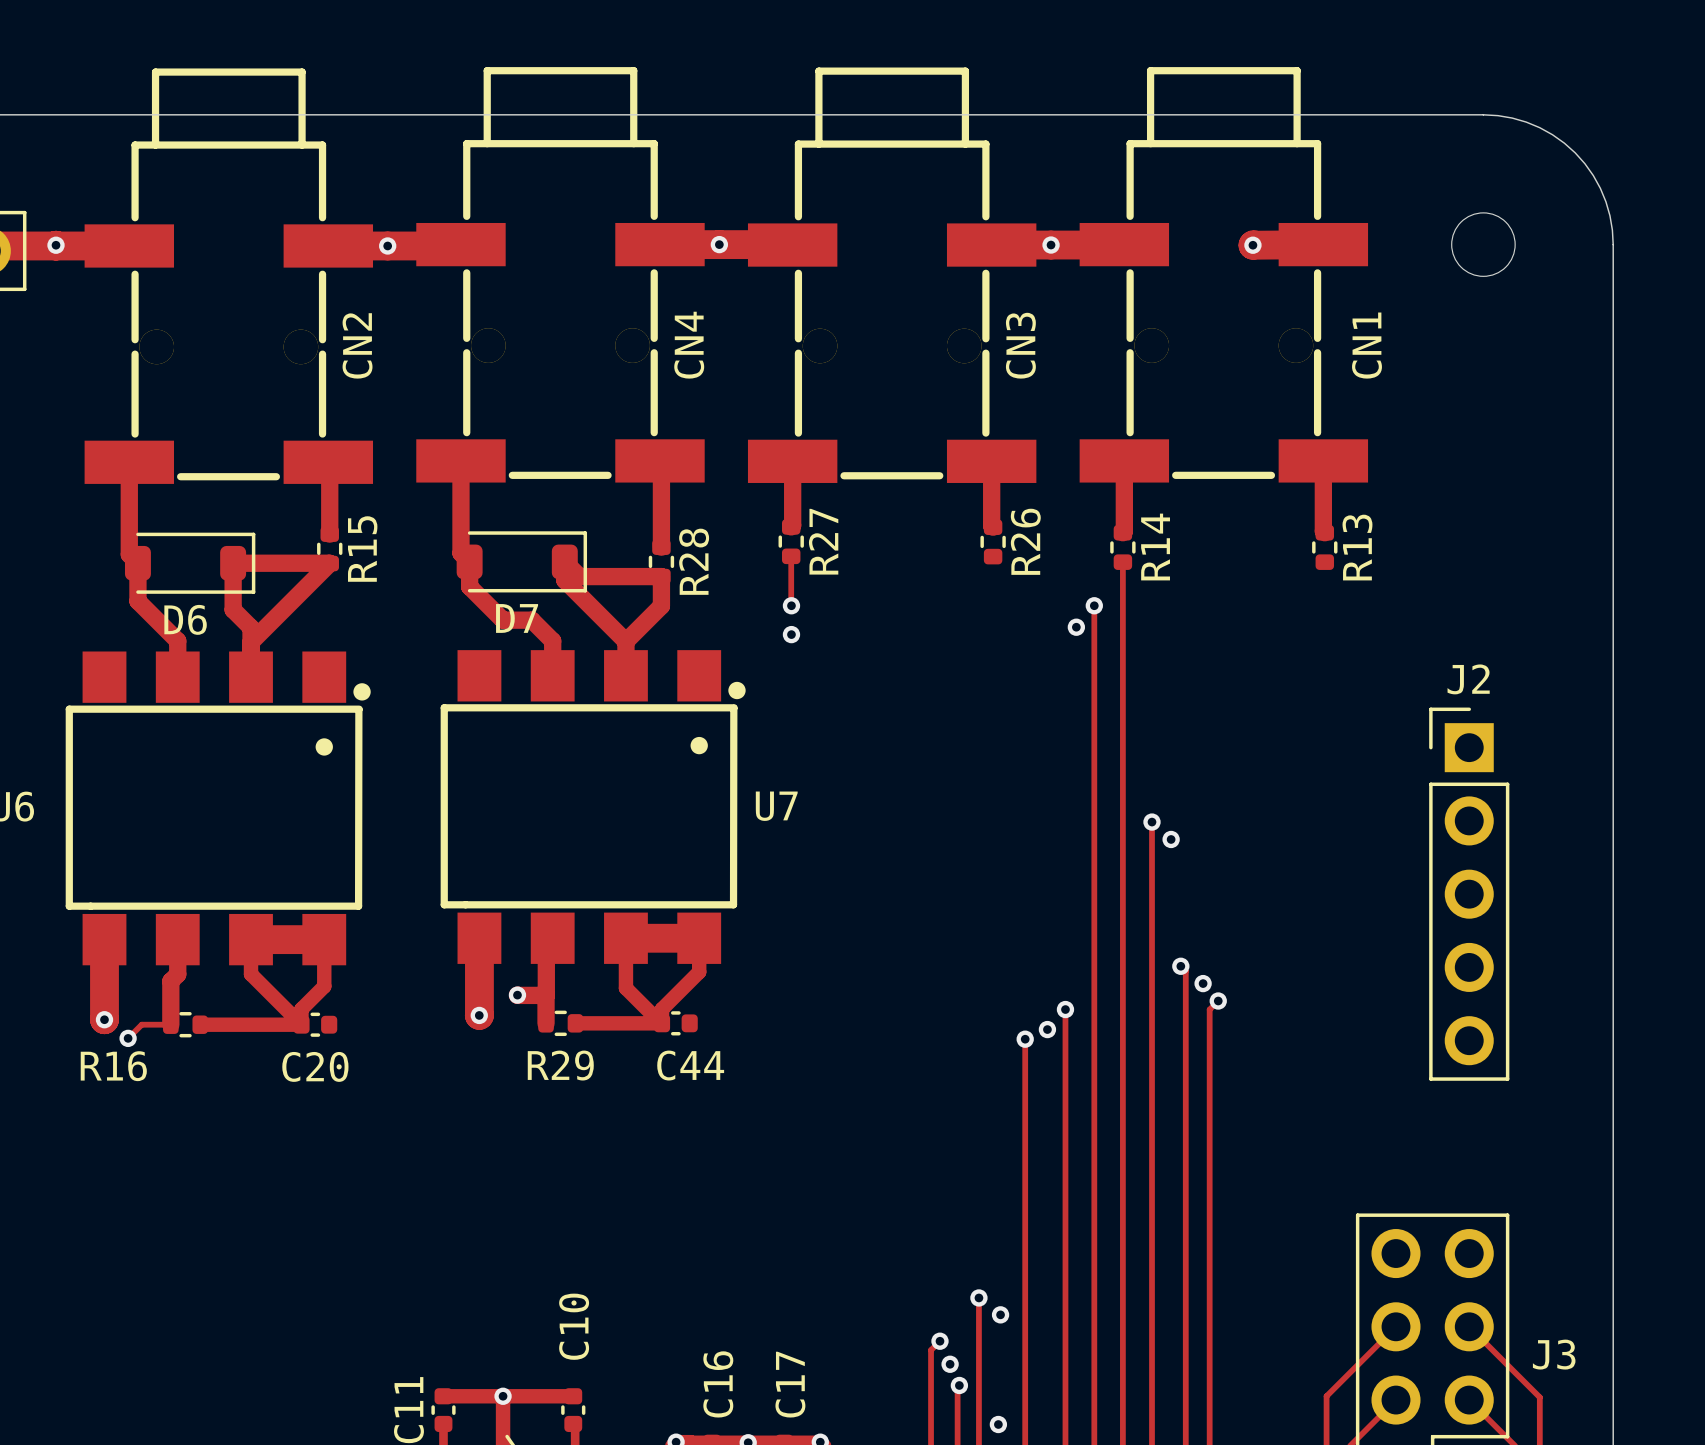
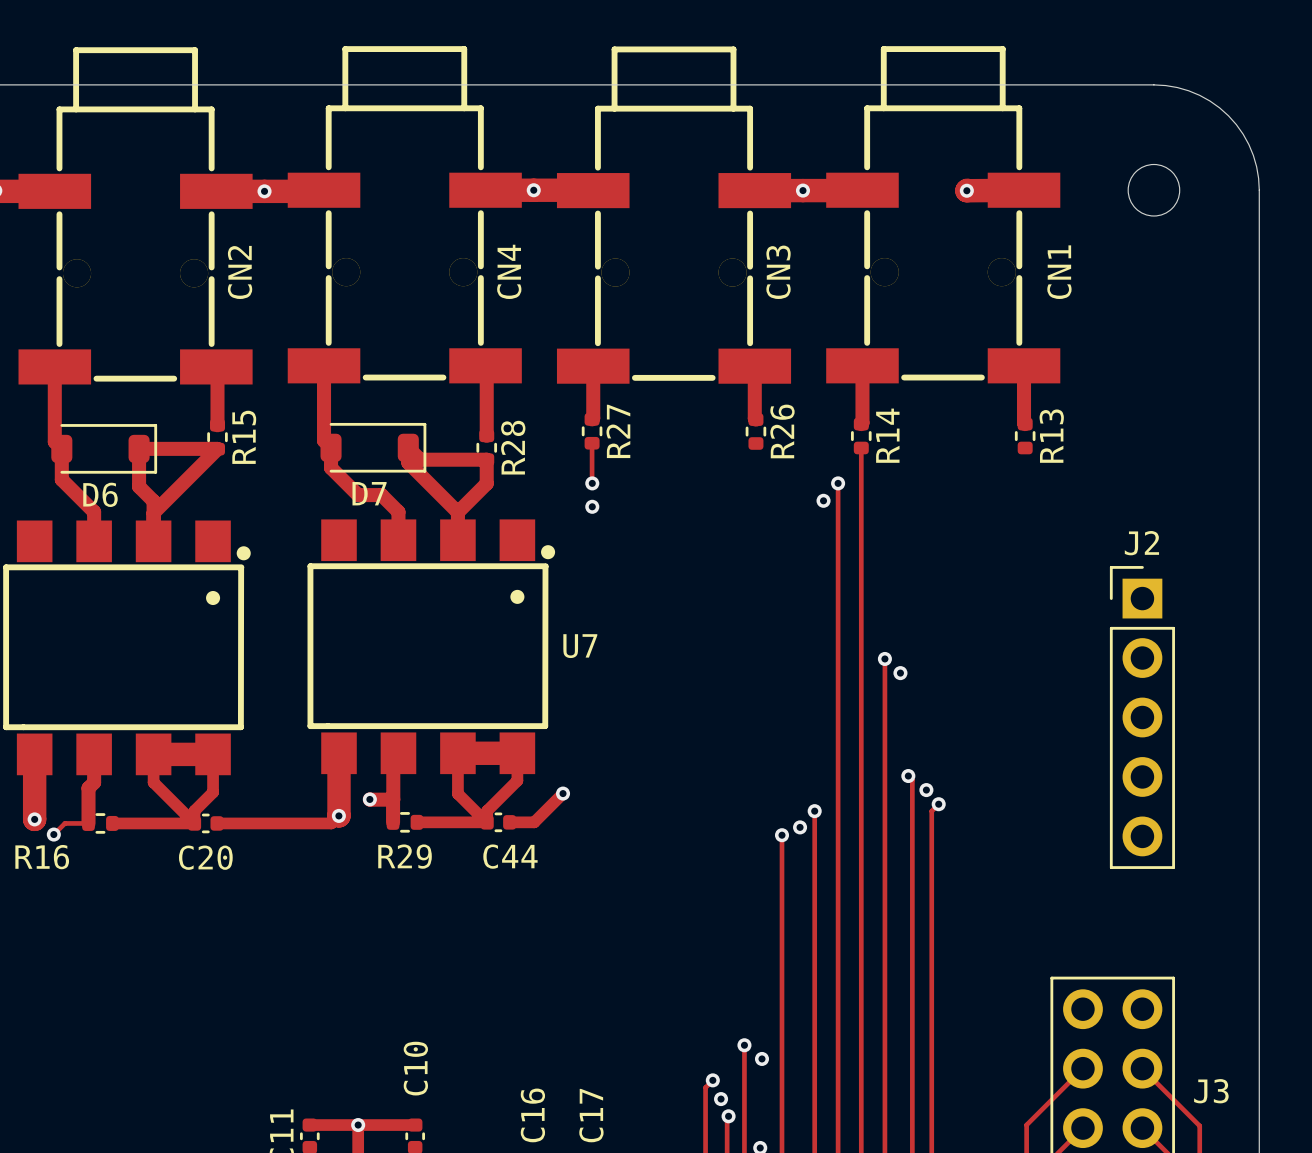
track: none -> (563, 793) (534, 822) (509, 822)
via: none -> (563, 793)
track: none -> (338, 815) (331, 823) (217, 823)

